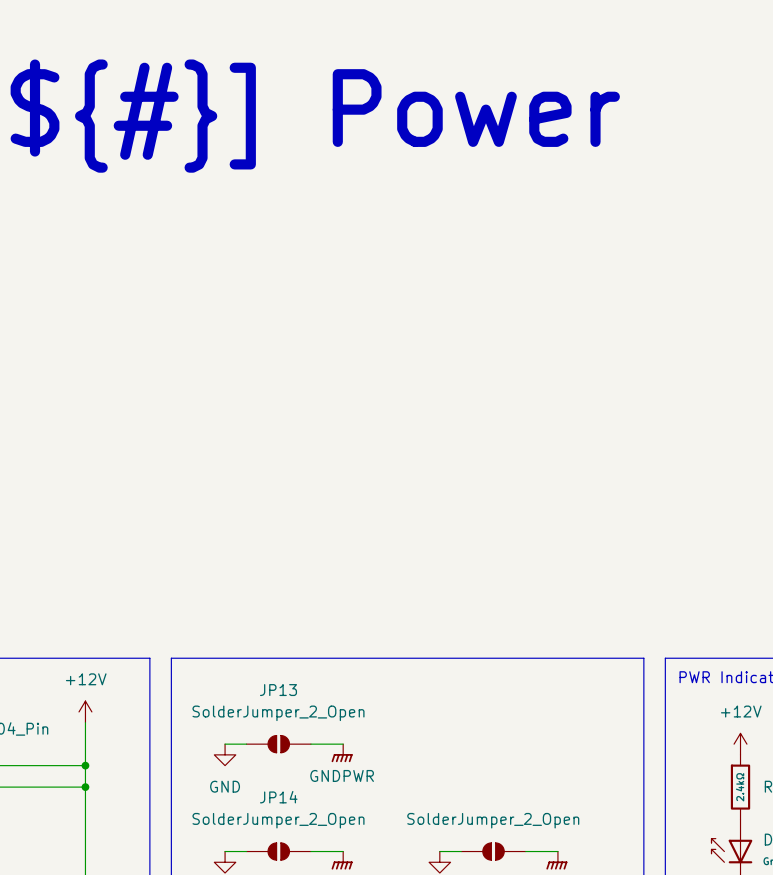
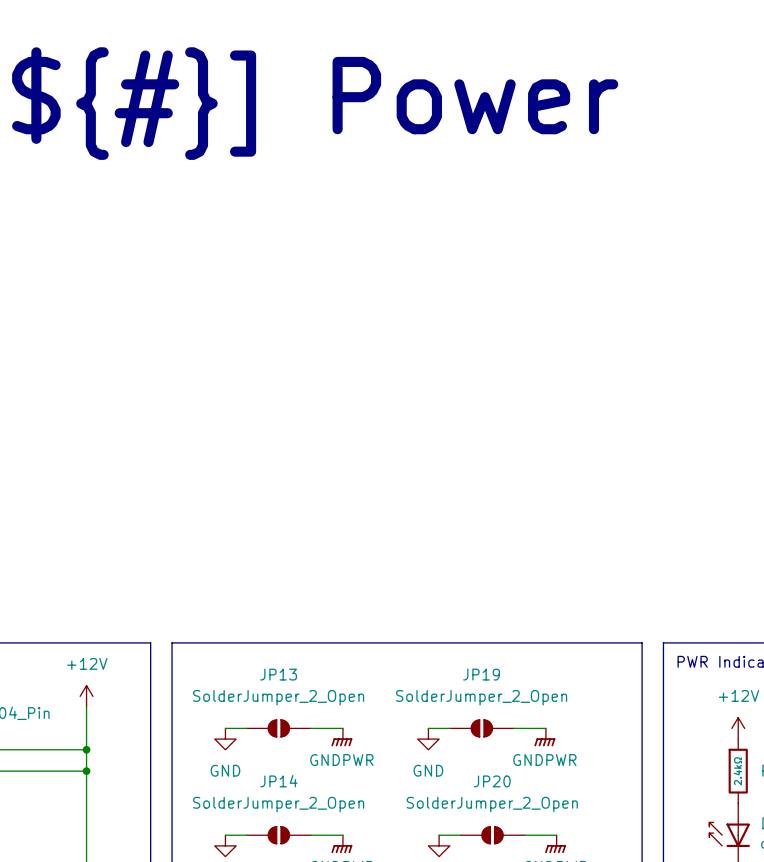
wire: none -> (428, 728) (449, 728)
JP19: none -> SolderJumper_2_Open (481, 728)
wire: none -> (513, 728) (545, 728)
power symbol: none -> GNDPWR (544, 737)
power symbol: none -> GND (428, 739)
JP20 name: none -> JP20 (492, 781)

